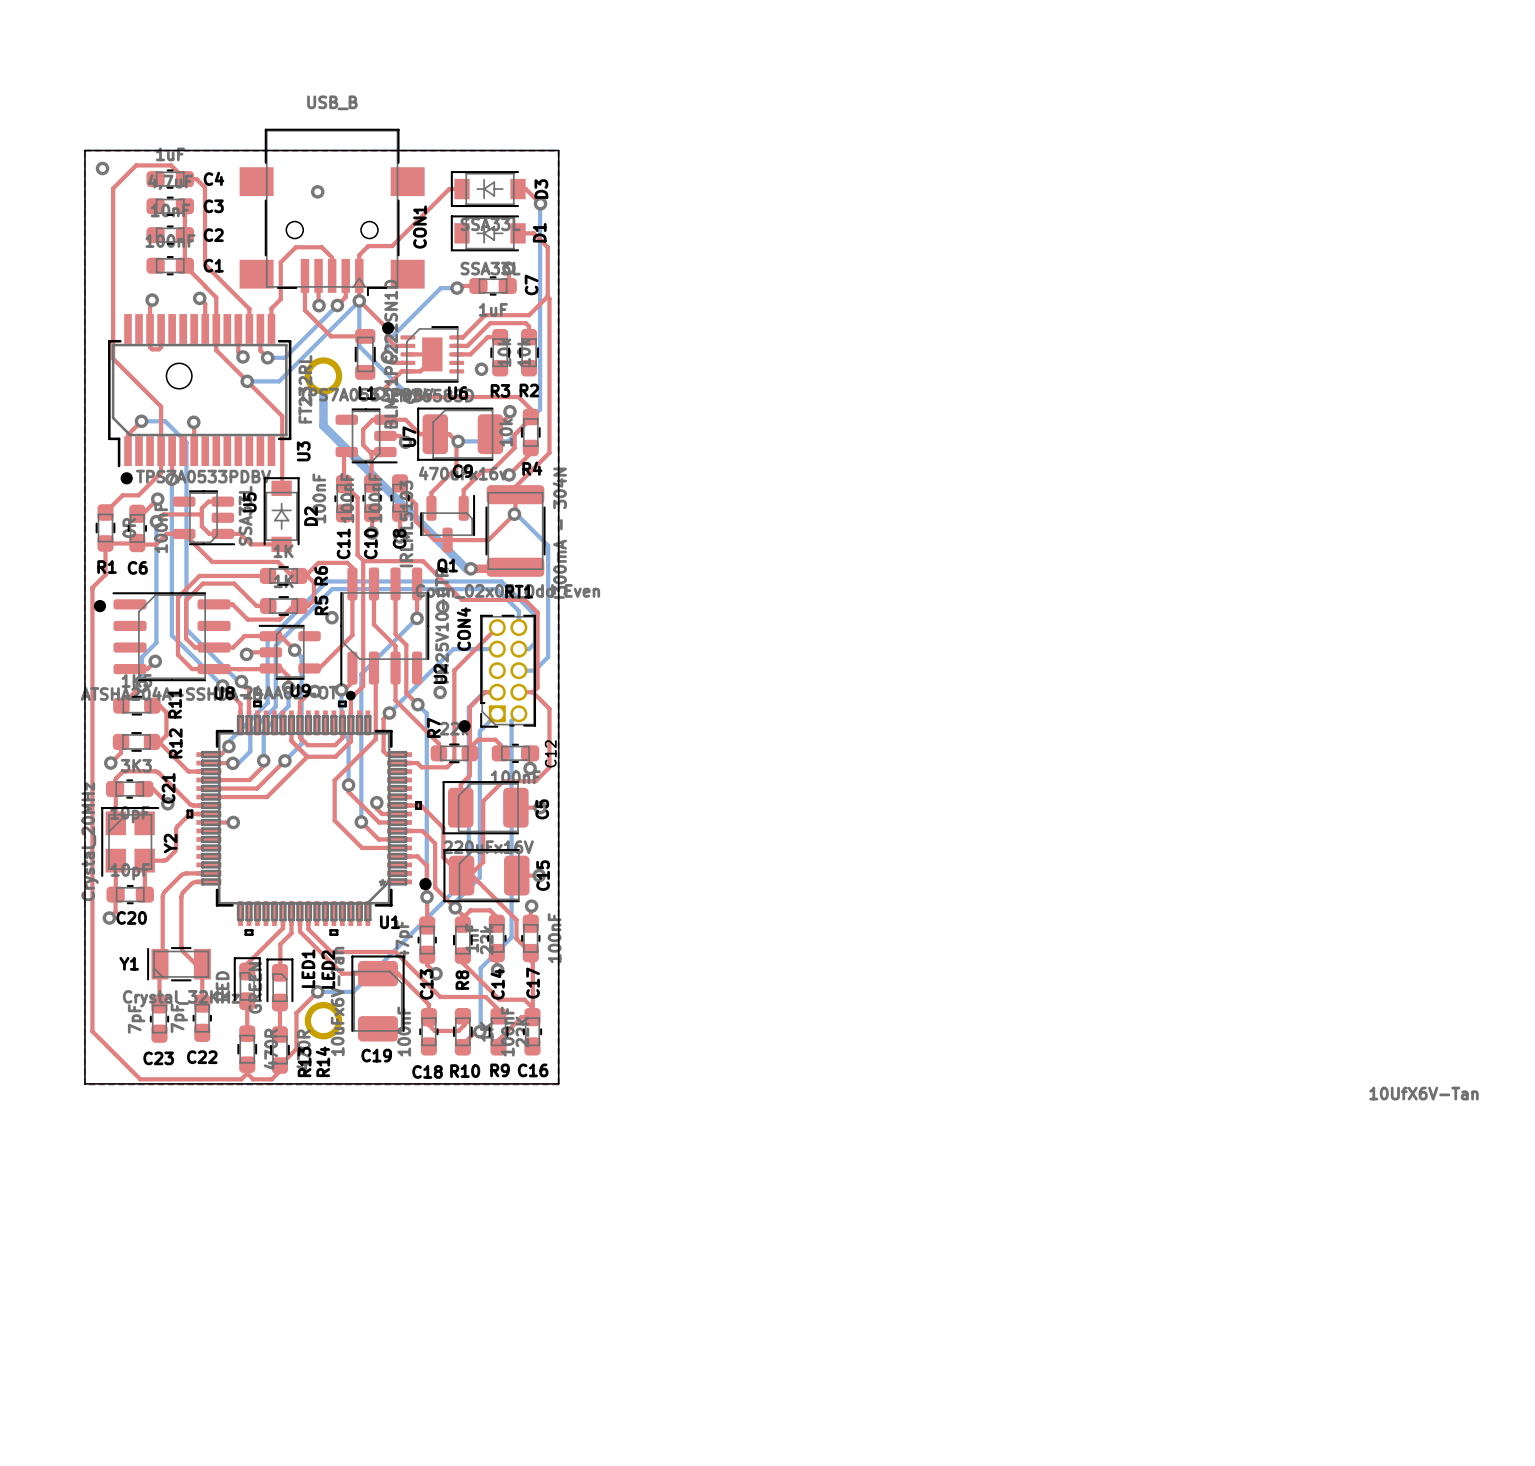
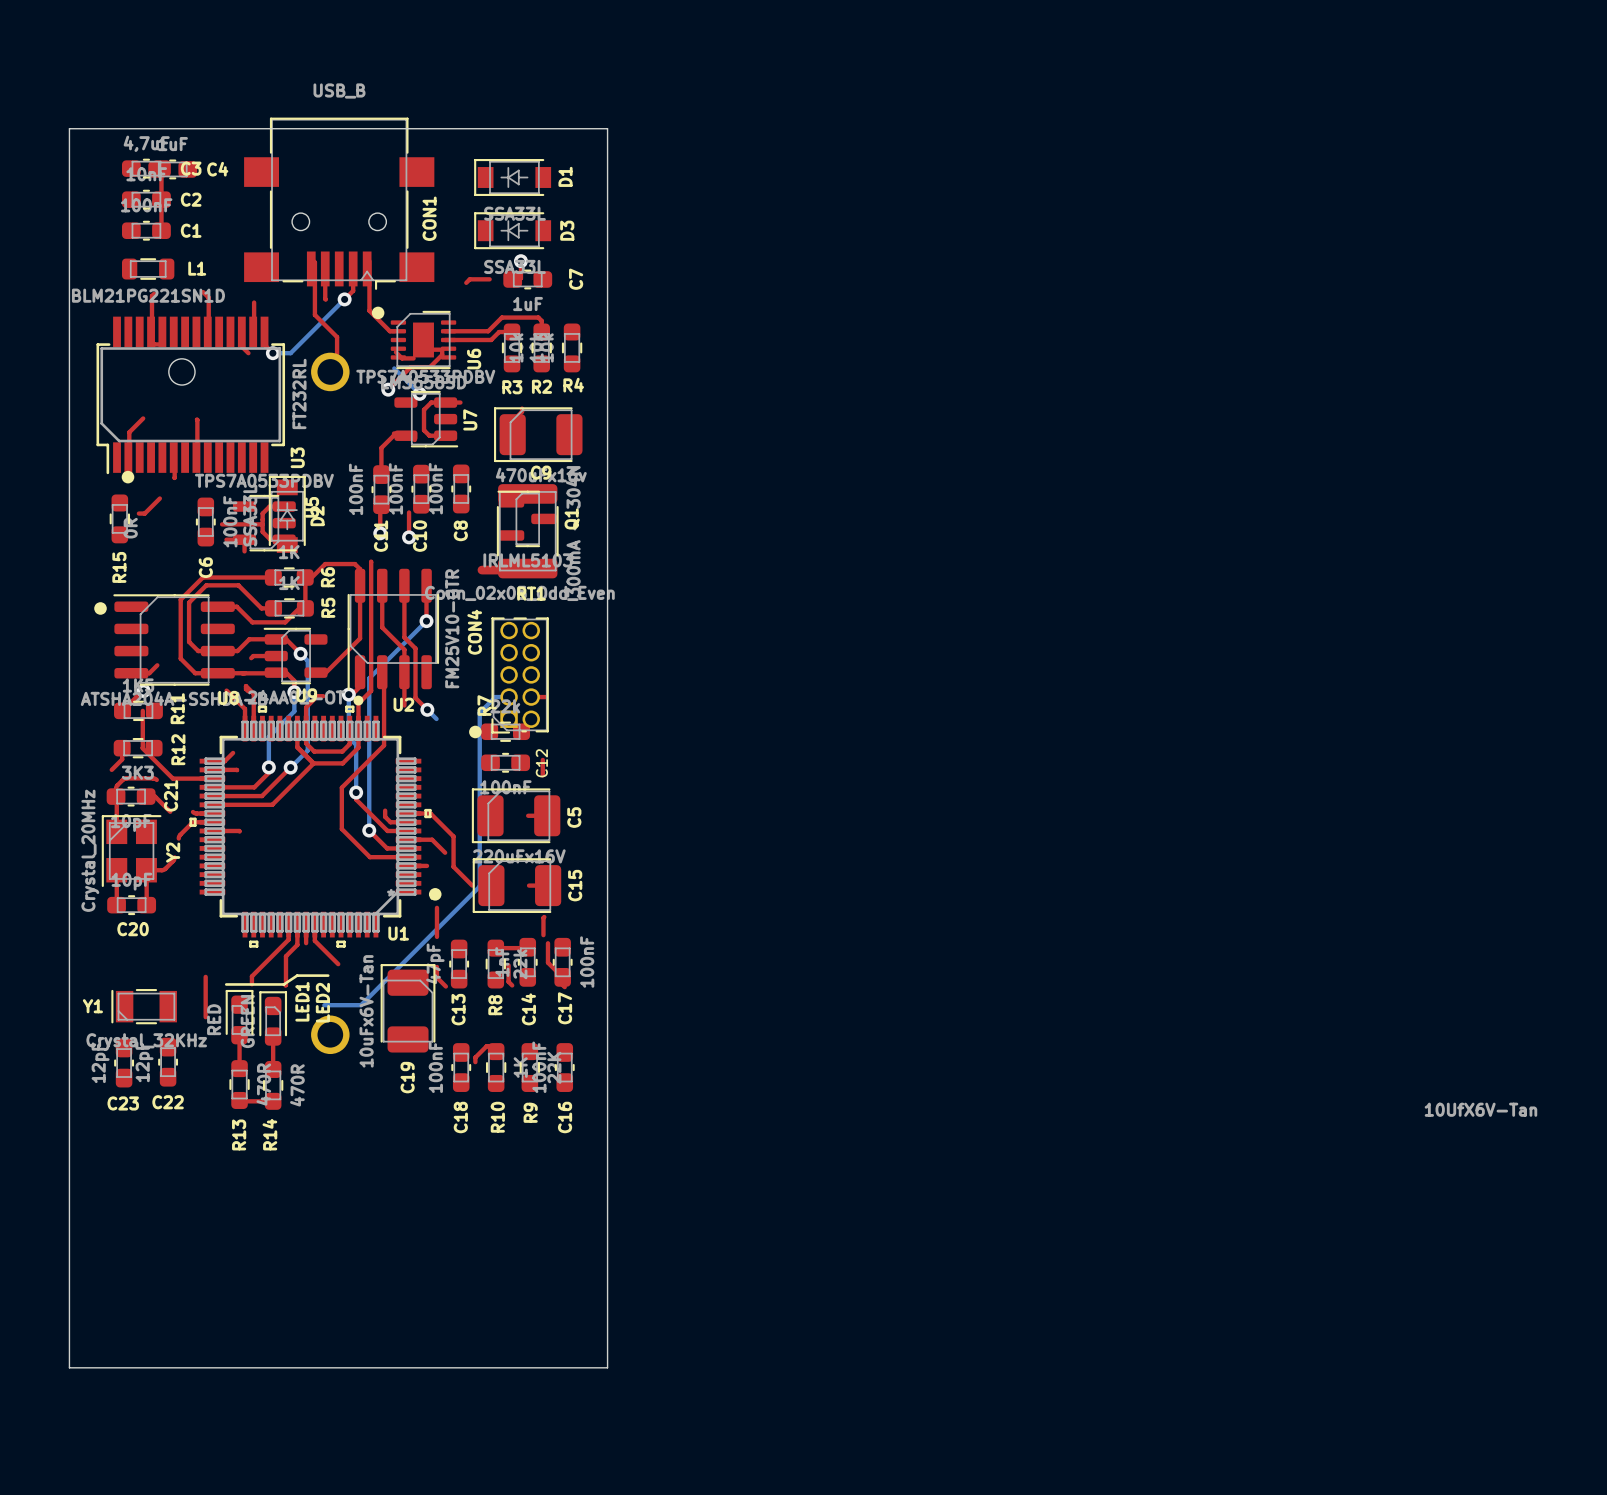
board edge: (84, 150) (558, 150) (558, 1083) (84, 1083) (84, 150) -> (69, 128) (69, 1367) (607, 1367) (607, 128) (69, 128)
via: (102, 168) -> none
top track: none -> (161, 174) (161, 235)
top track: (113, 188) (136, 165) (171, 165) (184, 179) (196, 179) (205, 187) (205, 264) (249, 308) -> none
top track: (113, 188) (113, 358) (161, 406) (161, 472) (138, 495) (122, 495) (105, 512) -> none
top track: (462, 189) (449, 189) (392, 246) (368, 246) (359, 255) (359, 300) -> none
D3 position: (488, 189) -> (512, 230)
top track: (518, 189) (525, 189) (540, 203) -> none
via: (317, 191) -> none
bottom track: (540, 203) (540, 409) (508, 441) (456, 441) -> none
via: (540, 203) -> none
C3 position: (170, 206) -> (146, 168)
top track: (184, 206) (184, 265) (205, 286) -> none
D1 position: (488, 233) -> (512, 177)
top track: (518, 233) (533, 233) (547, 247) (547, 296) (529, 315) (485, 315) (462, 337) (456, 337) -> none
C2 position: (170, 235) -> (146, 199)
C1 position: (170, 265) -> (146, 230)
top track: none -> (313, 261) (314, 314) (337, 337) (337, 354)
top track: none -> (369, 261) (369, 310) (389, 331) (394, 331)
top track: (304, 275) (304, 310) (331, 336) (365, 336) -> none
top track: (332, 275) (332, 257) (321, 247) (295, 247) (280, 262) (280, 299) (271, 308) (271, 328) -> none
C7 name position: C7 (531, 284) -> C7 (576, 279)
C7 position: (493, 285) -> (527, 279)
top track: (205, 286) (216, 297) (216, 350) (282, 416) (281, 488) -> none
bottom track: (457, 288) (440, 288) (387, 341) (387, 356) -> none
via: (457, 288) -> none
top track: (547, 296) (549, 298) (549, 452) (515, 486) (515, 513) (488, 540) (434, 540) (416, 521) (416, 504) (400, 488) (400, 483) -> none
via: (199, 298) -> none
via: (152, 300) -> none
top track: (359, 300) (387, 328) (387, 338) (394, 345) (404, 345) -> none
bottom track: (359, 300) (359, 346) (385, 372) -> none
via: (359, 300) -> none
bottom track: (359, 301) (279, 381) (247, 381) -> none
via: (319, 305) -> none
top track: (490, 323) (467, 345) (453, 345) -> (501, 317) (488, 331) (445, 331)
drawing position: (388, 328) -> (378, 312)
top track: (479, 344) (470, 354) (453, 354) -> (491, 339) (445, 339)
L1 rotation: 0° (365, 354) -> 90° clockwise (148, 269)
L1 position: (365, 354) -> (148, 269)
U6 position: (432, 354) -> (423, 339)
via: (243, 356) -> none
via: (387, 356) -> none
via: (481, 369) -> none
bottom track: (323, 376) (323, 425) (466, 568) (470, 568) -> none
via: (247, 381) -> none
U3 position: (199, 390) -> (190, 395)
L1 name position: L1 (367, 393) -> L1 (197, 268)
U6 name rotation: 0° (458, 393) -> 90° counterclockwise (474, 359)
U6 name position: U6 (458, 393) -> U6 (474, 359)
top track: (410, 397) (518, 397) (530, 409) (530, 418) (514, 434) (514, 447) (491, 470) (483, 470) (463, 490) (463, 508) -> none
top track: none -> (460, 402) (431, 402) (424, 409) (424, 430) (429, 435) (439, 435)
via: (509, 411) -> none
bottom track: (141, 421) (165, 421) (186, 442) (186, 629) (238, 681) (241, 681) -> none
via: (141, 421) -> none
via: (193, 422) -> none
R4 position: (530, 432) -> (572, 347)
C9 position: (460, 434) -> (538, 434)
U7 position: (366, 435) -> (426, 419)
top track: none -> (400, 435) (393, 435) (381, 447) (381, 474)
via: (458, 441) -> none
via: (405, 442) -> none
top track: (530, 447) (530, 453) (509, 474) -> none
top track: (346, 452) (344, 454) (344, 484) (357, 497) (357, 554) (363, 560) -> none
top track: (374, 452) (371, 454) (372, 483) -> none
top track: (385, 452) (370, 452) (363, 445) (363, 429) (372, 419) (405, 419) (419, 434) (449, 434) (456, 441) (456, 467) (431, 492) (431, 508) -> none
via: (509, 474) -> none
bottom track: (171, 479) (171, 635) (222, 685) -> none
via: (171, 479) -> none
C11 position: (344, 498) -> (381, 489)
C10 position: (372, 498) -> (421, 489)
C8 position: (400, 498) -> (461, 488)
via: (157, 499) -> none
top track: (222, 501) (208, 501) (201, 508) (201, 526) (209, 533) (240, 533) (250, 544) (273, 544) -> none
top track: none -> (284, 506) (269, 506) (262, 513) (262, 531) (270, 539) (284, 539)
bottom track: (515, 512) (548, 545) (548, 657) (534, 670) (518, 670) -> none
top track: (201, 514) (163, 514) (156, 521) -> none
via: (514, 514) -> none
U5 position: (204, 517) -> (264, 523)
bottom track: (156, 521) (156, 642) (142, 657) (142, 686) -> none
via: (156, 521) -> none
Q1 rotation: 0° (447, 523) -> 90° counterclockwise (527, 518)
Q1 position: (447, 523) -> (527, 518)
top track: none -> (222, 524) (262, 524)
R1 position: (105, 527) -> (119, 518)
C6 position: (137, 528) -> (205, 522)
top track: none -> (226, 539) (244, 539) (244, 551)
top track: (138, 544) (156, 544) (166, 533) (184, 533) (212, 561) (277, 561) (291, 575) (307, 575) (313, 582) (313, 600) (308, 606) (293, 606) -> none
top track: (139, 545) (137, 543) (105, 543) (105, 574) (92, 587) (92, 1031) (140, 1079) (241, 1079) (247, 1073) -> none
top track: (363, 561) (423, 561) (461, 599) (524, 599) (537, 612) (537, 687) (532, 692) (549, 708) (549, 767) (535, 781) (503, 781) (483, 801) (483, 862) (469, 875) -> none
R1 name: R1 (107, 567) -> R15 (119, 567)
C6 name rotation: 0° (137, 567) -> 90° counterclockwise (205, 567)
via: (470, 568) -> none
top track: none -> (305, 577) (305, 608)
via: (442, 606) -> none
via: (331, 617) -> none
top track: (497, 627) (454, 670) (454, 759) (447, 767) (421, 767) (417, 763) (399, 763) -> none
bottom track: (518, 627) (518, 611) (496, 589) (332, 589) (275, 645) (275, 706) (250, 732) (250, 751) (238, 763) (232, 763) -> none
bottom track: (497, 649) (453, 649) (389, 713) -> none
bottom track: (518, 649) (528, 649) (535, 643) (535, 615) (501, 581) (326, 581) (267, 640) (267, 702) (228, 741) (228, 746) -> none
via: (246, 654) -> none
via: (155, 661) -> none
U2 name rotation: 0° (440, 673) -> 90° clockwise (403, 704)
U2 name position: U2 (440, 673) -> U2 (403, 704)
via: (241, 681) -> none
via: (222, 685) -> none
via: (314, 691) -> none
via: (440, 692) -> none
top track: (497, 692) (484, 692) (469, 707) (469, 775) (460, 784) (460, 807) (450, 807) -> none
top track: (395, 700) (438, 743) (438, 753) -> none
top track: none -> (142, 710) (142, 747)
top track: (152, 705) (159, 705) (166, 712) (166, 735) (159, 741) (152, 741) -> none
top track: (389, 713) (383, 718) (383, 751) (386, 754) (399, 754) -> none
via: (389, 713) -> none
bottom track: (426, 713) (426, 896) -> none
bottom track: (497, 713) (479, 731) (479, 877) (455, 902) (455, 907) -> none
bottom track: (518, 713) (511, 721) (511, 937) (480, 968) (479, 1031) -> none
top track: (158, 741) (188, 771) -> (142, 748) (172, 778) (191, 778)
via: (228, 746) -> none
top track: (469, 748) (478, 739) (495, 739) (500, 745) (500, 753) -> none
R7 position: (454, 753) -> (505, 731)
C12 position: (515, 753) -> (505, 762)
via: (110, 763) -> none
via: (232, 763) -> none
via: (530, 768) -> none
top track: (151, 771) (158, 772) (189, 804) -> (153, 778) (156, 779)
via: (376, 802) -> none
via: (167, 803) -> none
C5 position: (485, 807) -> (516, 815)
via: (540, 807) -> none
via: (233, 822) -> none
top track: (176, 829) (175, 850) (166, 859) (159, 860) -> (174, 857) (165, 868) (161, 870)
top track: (435, 843) (435, 887) (462, 915) (462, 924) -> none
top track: (417, 856) (427, 865) (427, 897) -> none
top track: (208, 873) (183, 874) (163, 894) (162, 961) (159, 964) (159, 1004) -> none
top track: (455, 874) (472, 875) (516, 919) (516, 938) (530, 953) (530, 960) (532, 962) (532, 1017) -> none
C15 position: (486, 875) -> (516, 885)
via: (539, 875) -> none
top track: (208, 881) (192, 882) (181, 896) (181, 948) (195, 964) (202, 964) -> none
top track: (115, 894) (115, 911) (109, 918) -> none
via: (427, 897) -> none
via: (531, 906) -> none
via: (455, 907) -> none
via: (109, 918) -> none
top track: (462, 918) (470, 910) (490, 910) (496, 917) (496, 923) -> none
top track: (299, 931) (342, 973) (397, 973) (428, 1004) (428, 1024) (434, 1030) (458, 1030) (464, 1024) (464, 1016) -> none
top track: none -> (547, 943) (547, 962) (562, 977) (562, 985) (564, 987)
top track: none -> (498, 948) (532, 948)
C14 position: (496, 938) -> (527, 962)
C17 position: (530, 938) -> (562, 962)
C13 position: (427, 940) -> (459, 964)
R8 position: (462, 940) -> (495, 964)
top track: (331, 951) (395, 951) (440, 996) (485, 996) (498, 1009) (498, 1016) -> none
top track: (462, 955) (462, 963) (499, 999) (524, 999) (532, 1007) (532, 1017) -> none
line: none -> (328, 975) (297, 975) (283, 984) (226, 984)
Y1 position: (179, 964) -> (144, 1006)
via: (497, 969) -> none
via: (436, 973) -> none
LED1 position: (247, 983) -> (239, 1017)
LED2 position: (279, 984) -> (273, 1018)
top track: (317, 991) (296, 1013) (296, 1048) (279, 1065) -> none
via: (317, 991) -> none
C19 position: (377, 998) -> (408, 1008)
top track: (247, 1001) (247, 1033) -> (239, 1035) (239, 1068)
top track: (279, 1002) (279, 1034) -> (273, 1036) (273, 1069)
top track: (532, 1017) (521, 1017) (498, 1040) (498, 1047) -> none
C22 value: 7pF (179, 1018) -> 12pF (144, 1061)
C22 position: (202, 1018) -> (168, 1062)
C23 value: 7pF (136, 1019) -> 12pF (100, 1062)
C23 position: (159, 1019) -> (124, 1063)
C18 position: (428, 1031) -> (461, 1067)
R10 position: (462, 1031) -> (496, 1067)
via: (479, 1031) -> none
R9 position: (498, 1031) -> (529, 1067)
C16 position: (532, 1031) -> (564, 1067)
R13 position: (247, 1049) -> (239, 1084)
R14 position: (279, 1050) -> (273, 1085)
C19 name rotation: 0° (376, 1055) -> 90° counterclockwise (407, 1077)
R14 name position: R14 (322, 1061) -> R14 (269, 1134)
R13 name position: R13 (304, 1062) -> R13 (239, 1134)
top track: (279, 1065) (279, 1071) (271, 1079) (253, 1079) (247, 1073) -> none
R9 name rotation: 0° (499, 1070) -> 90° counterclockwise (530, 1112)
C16 name rotation: 0° (533, 1070) -> 90° counterclockwise (565, 1117)
C18 name rotation: 0° (427, 1071) -> 90° counterclockwise (460, 1117)
R10 name rotation: 0° (465, 1071) -> 90° counterclockwise (497, 1117)
top track: none -> (240, 1101) (267, 1101)

